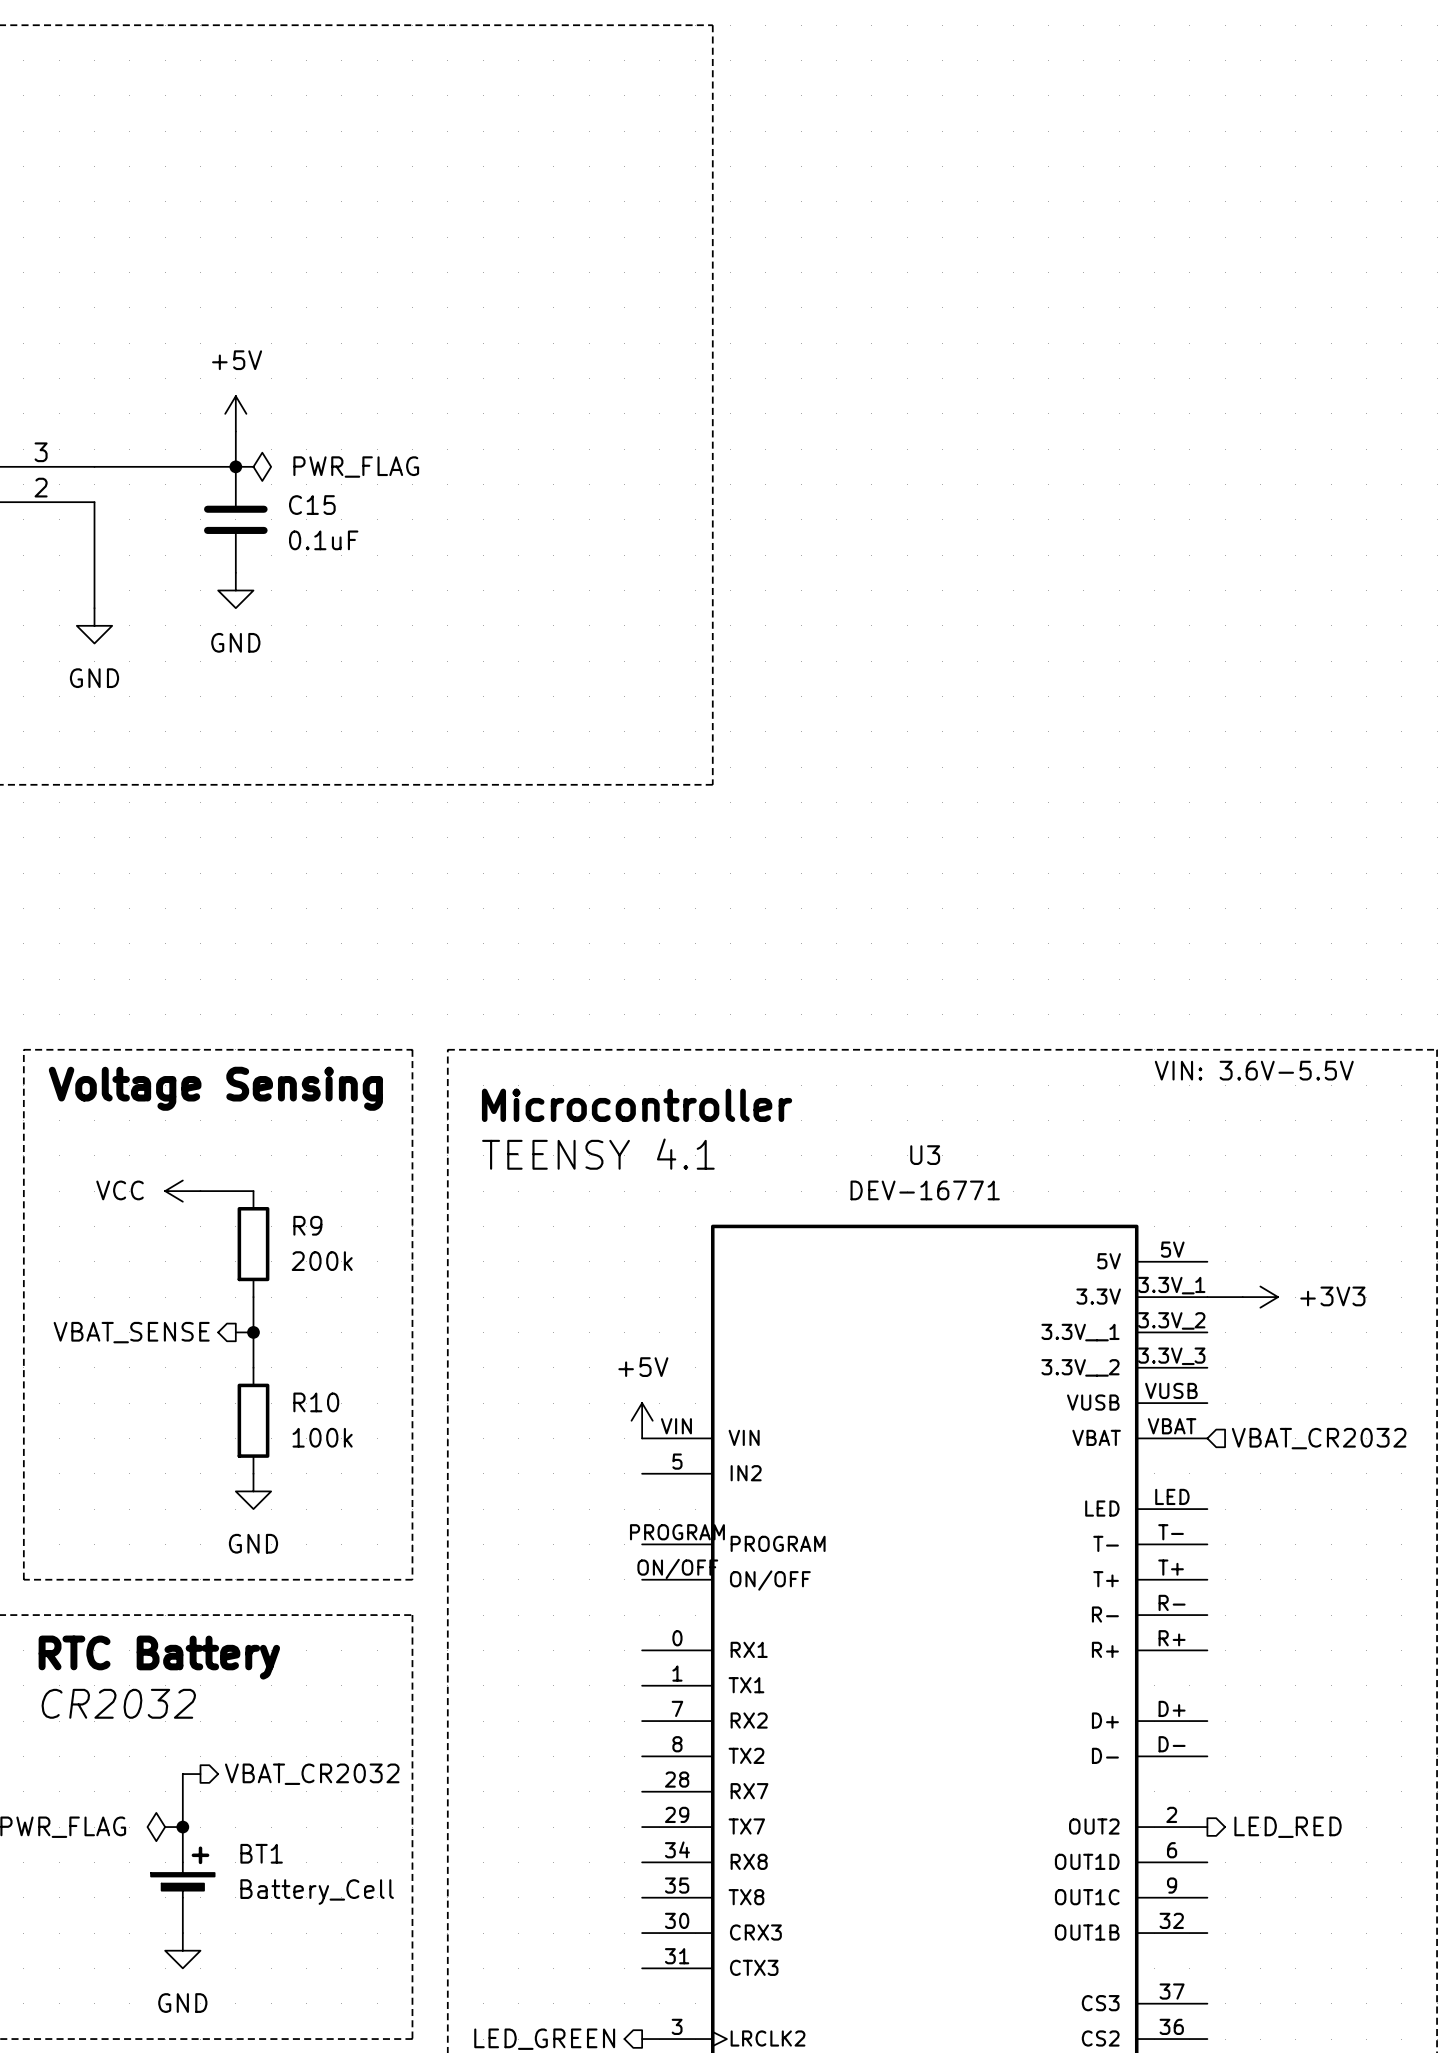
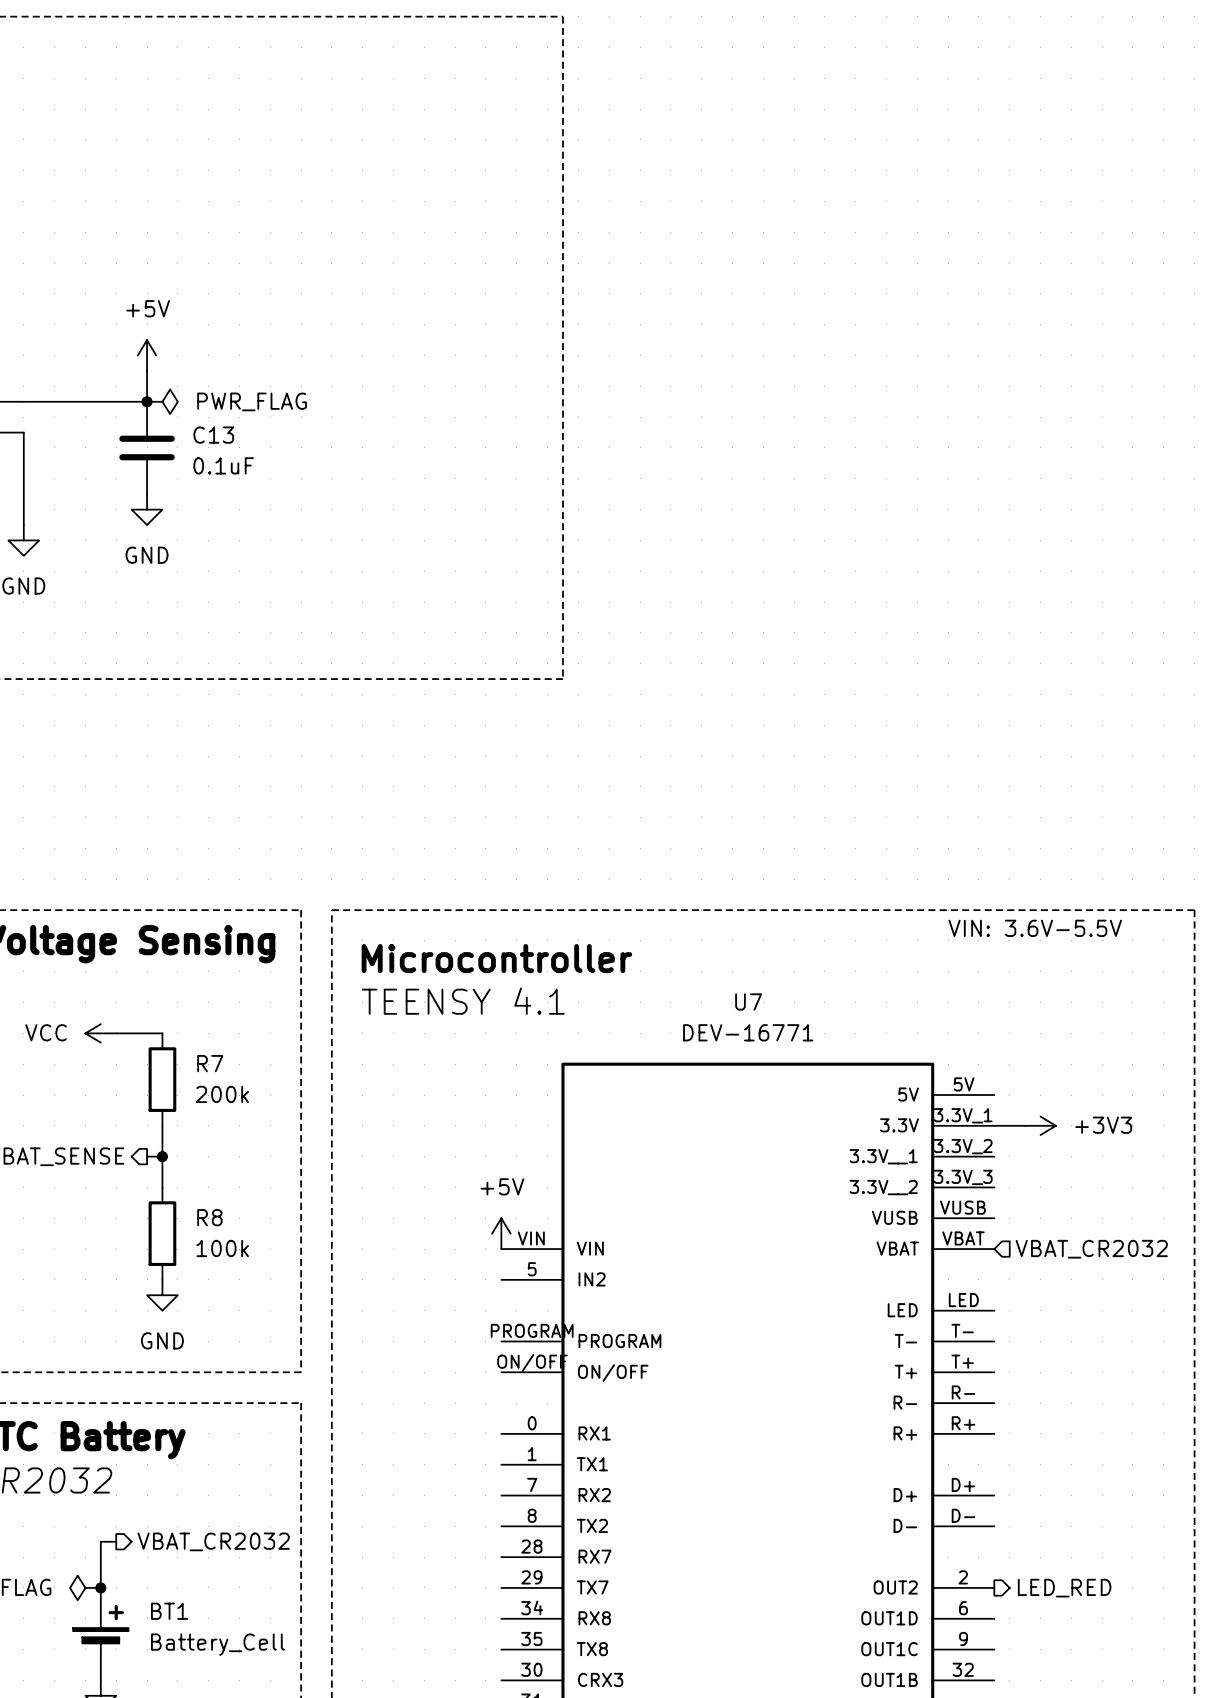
C15 name: C15 (312, 505) -> C13 (213, 435)
U3 name: U3 (925, 1155) -> U7 (748, 1001)
R9 name: R9 (307, 1225) -> R7 (210, 1063)
R10 name: R10 (316, 1402) -> R8 (209, 1217)

